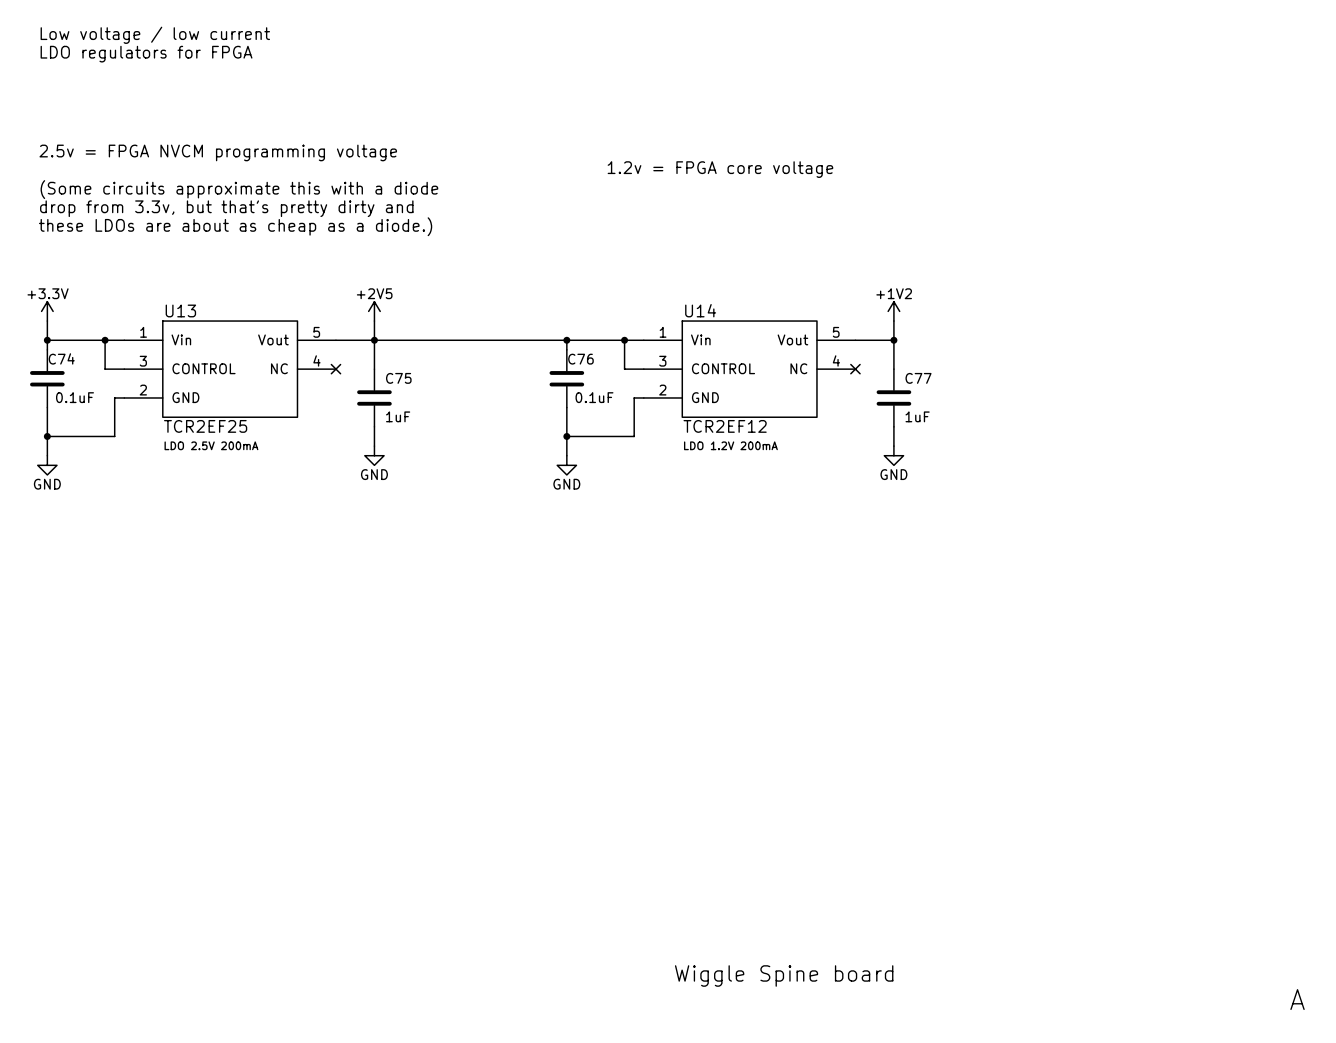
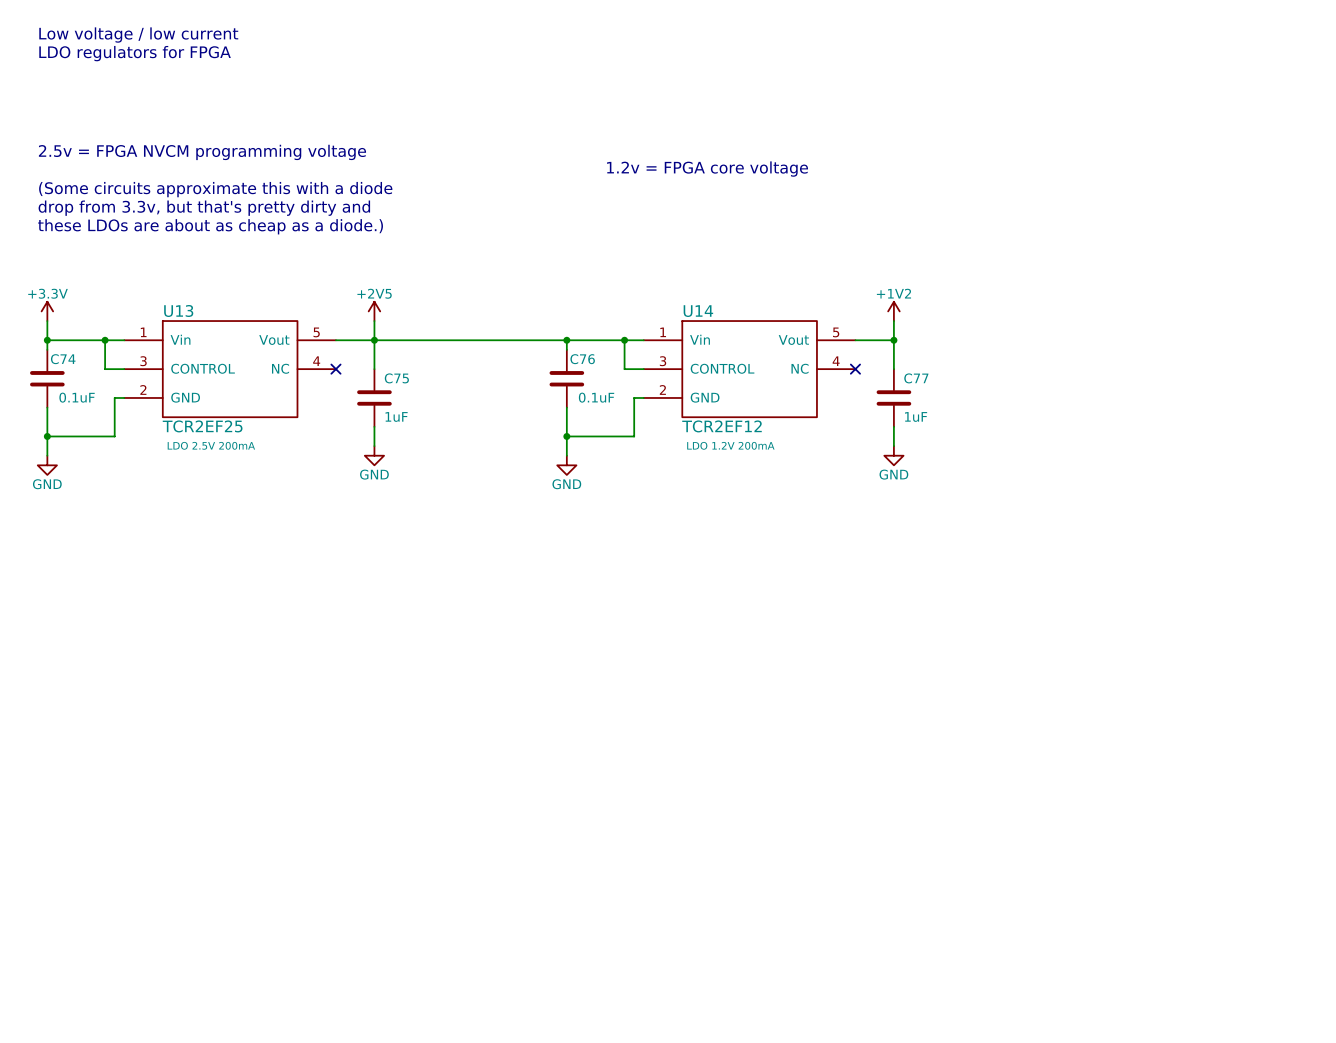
text: Wiggle Spine board (784, 975) -> none
text: A (1297, 999) -> none

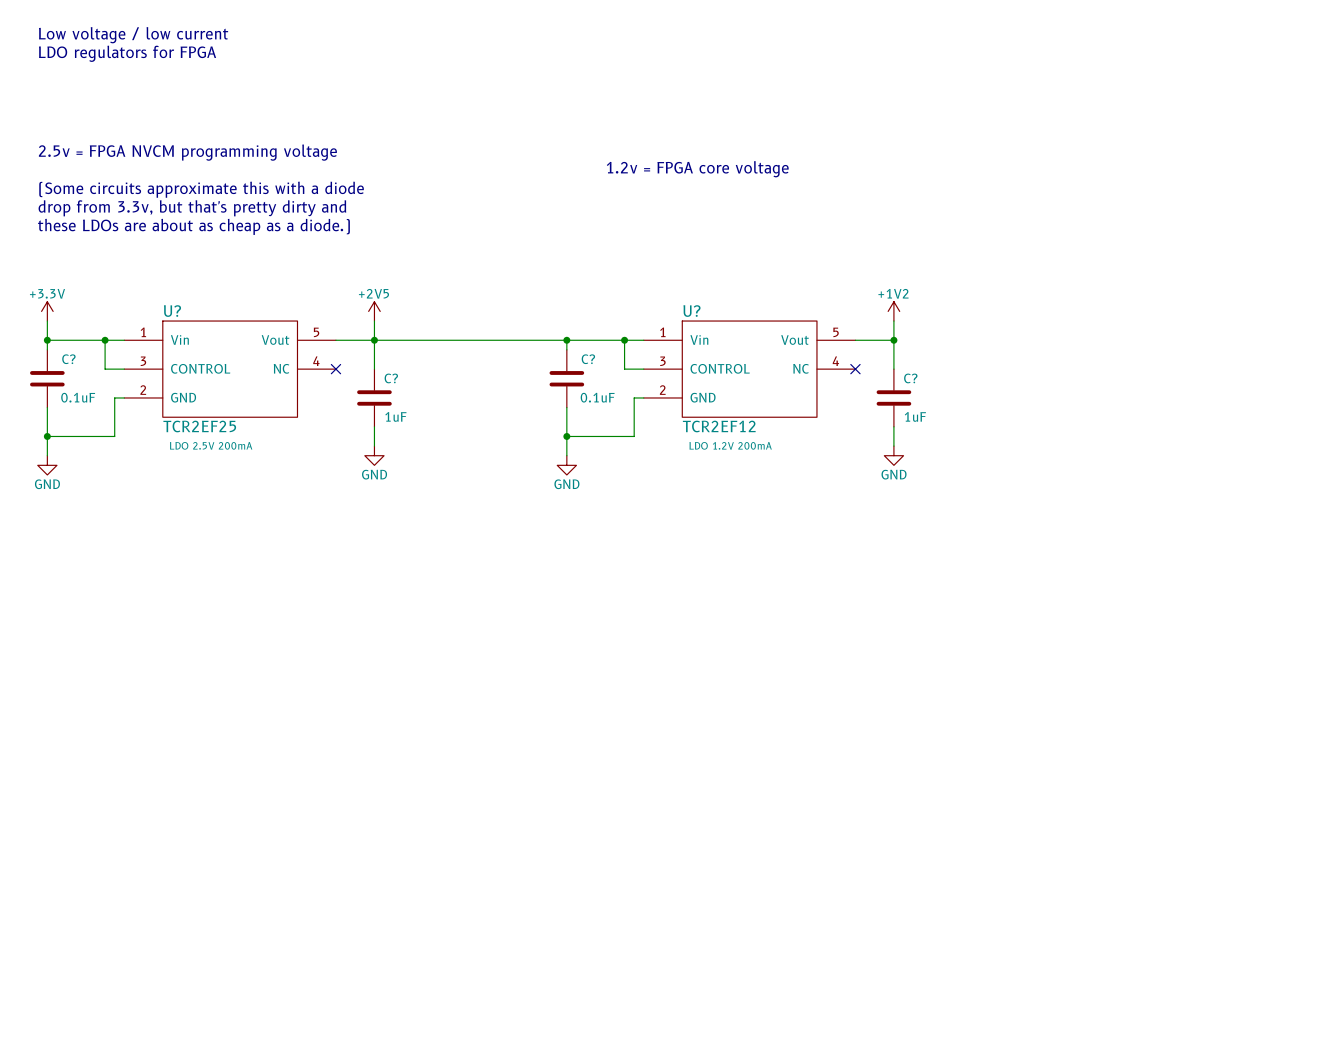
U13 name: U13 (178, 310) -> U? (172, 311)
U14 name: U14 (698, 311) -> U? (691, 311)
C74 name: C74 (63, 359) -> C? (68, 359)
C76 name: C76 (582, 359) -> C? (588, 359)
C75 name: C75 (396, 378) -> C? (391, 378)
C77 name: C77 (916, 378) -> C? (910, 378)

